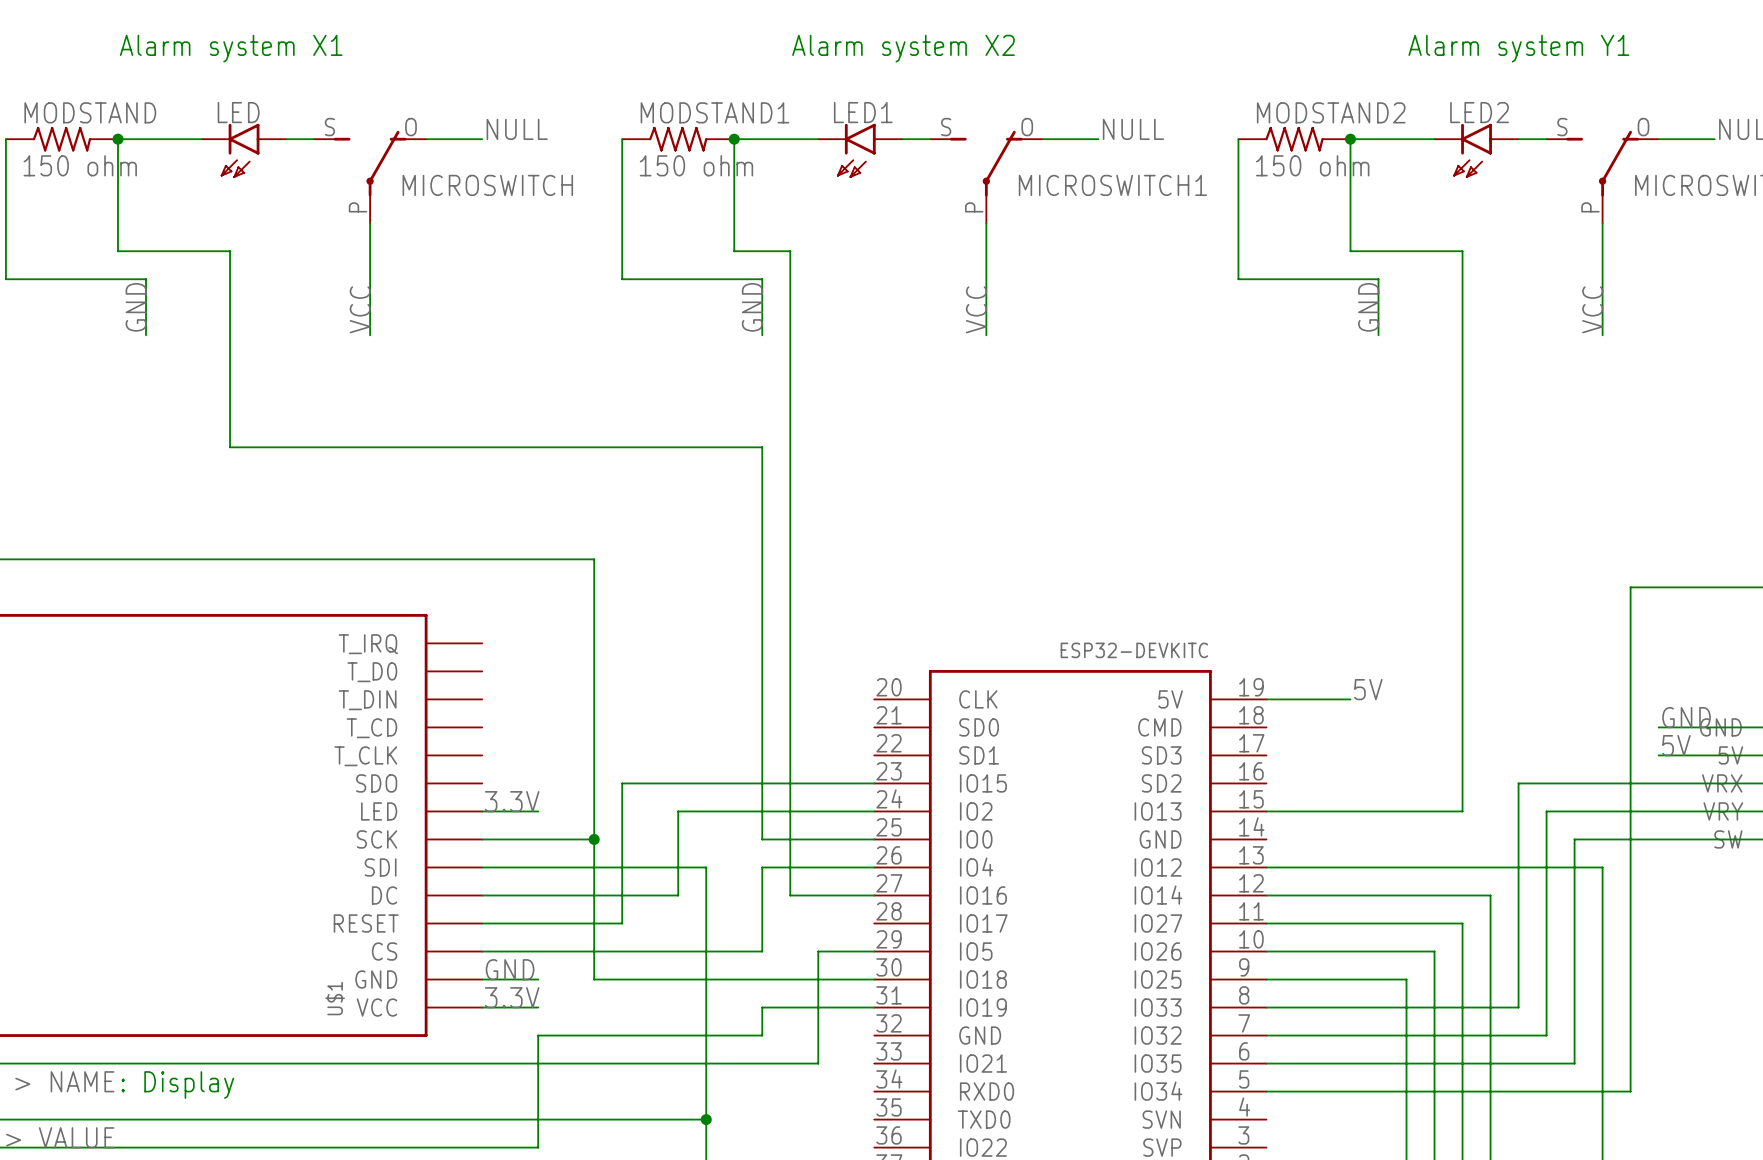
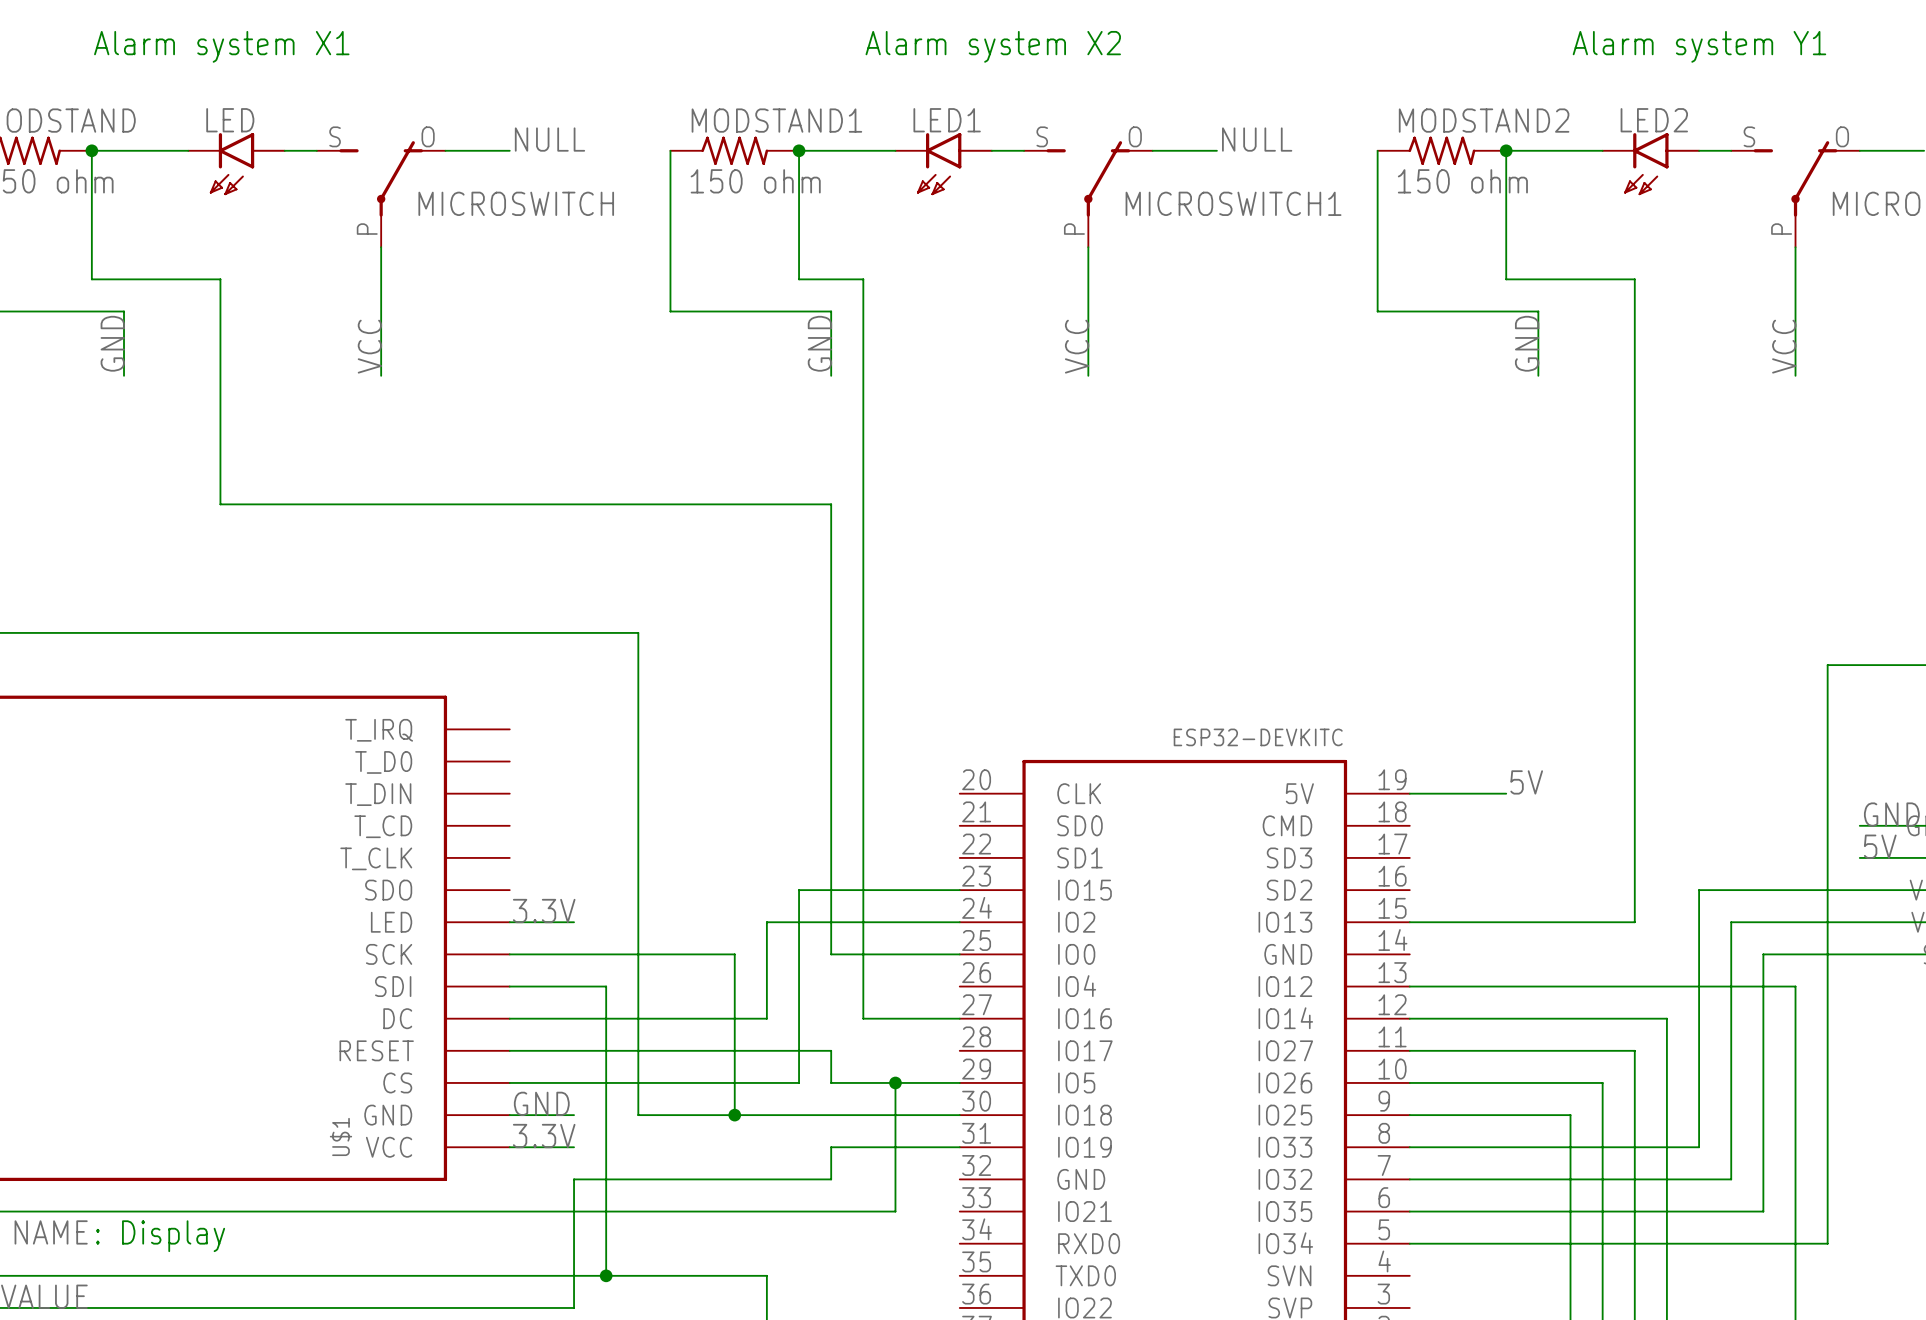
wire: (734, 783) (622, 783) (622, 923) -> (799, 890) (799, 1082)
wire: (706, 811) (678, 811) (678, 839) -> (766, 922) (766, 986)
wire: none -> (638, 954) (734, 954)
junction: (594, 839) -> none
wire: (566, 867) (706, 867) -> (606, 986) (606, 1275)
wire: (874, 867) (762, 867) (762, 923) -> (670, 1050) (831, 1050)
wire: (706, 895) (706, 1119) -> (766, 1018) (734, 1018) (734, 1115)
wire: (734, 951) (762, 951) -> (895, 1082) (831, 1082)
junction: none -> (895, 1082)
junction: none -> (734, 1115)
junction: none -> (606, 1275)
junction: (706, 1119) -> none

